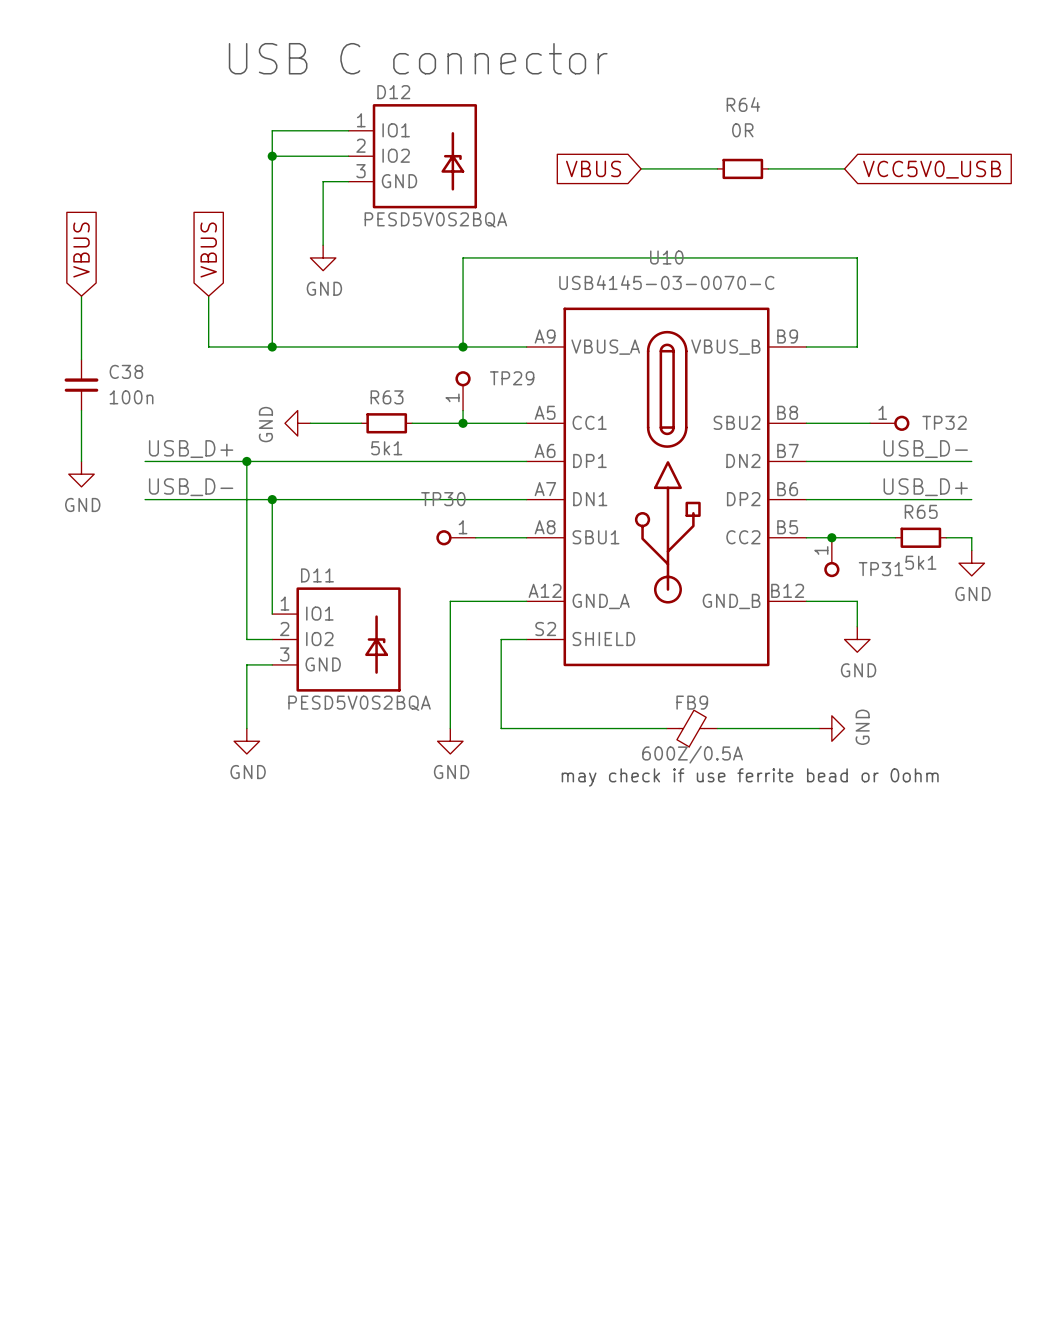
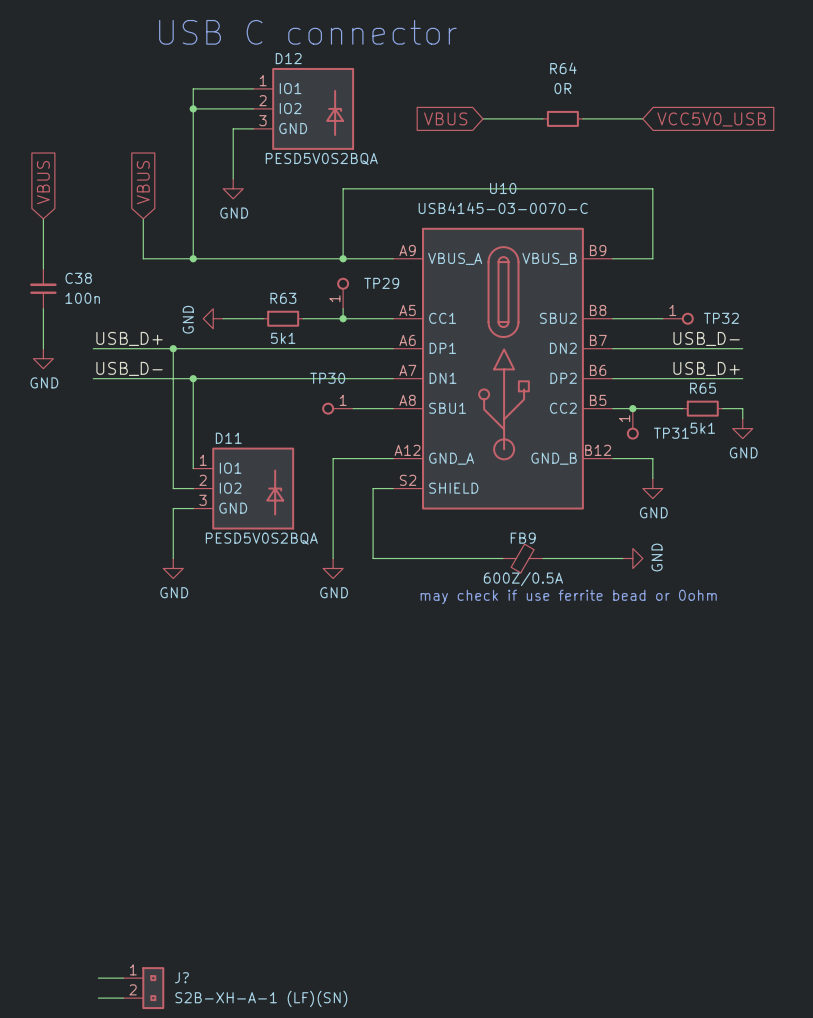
wire: none -> (98, 978) (123, 978)
J?: none -> (143, 988)
wire: none -> (98, 998) (123, 998)

